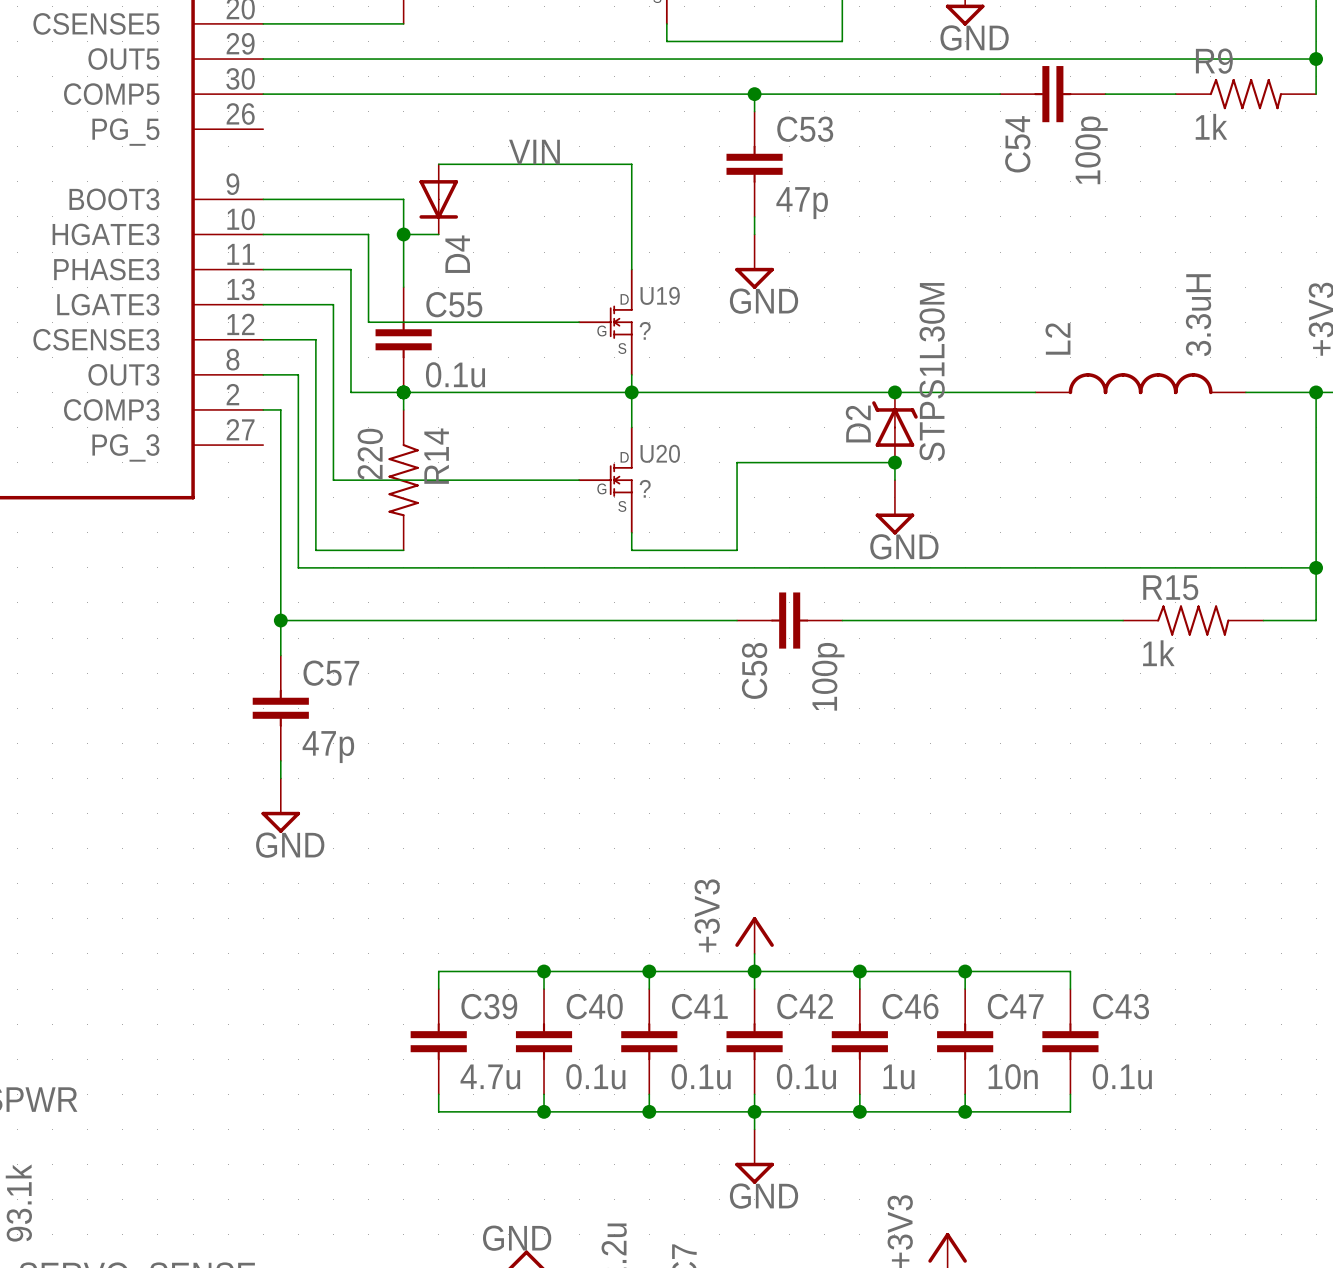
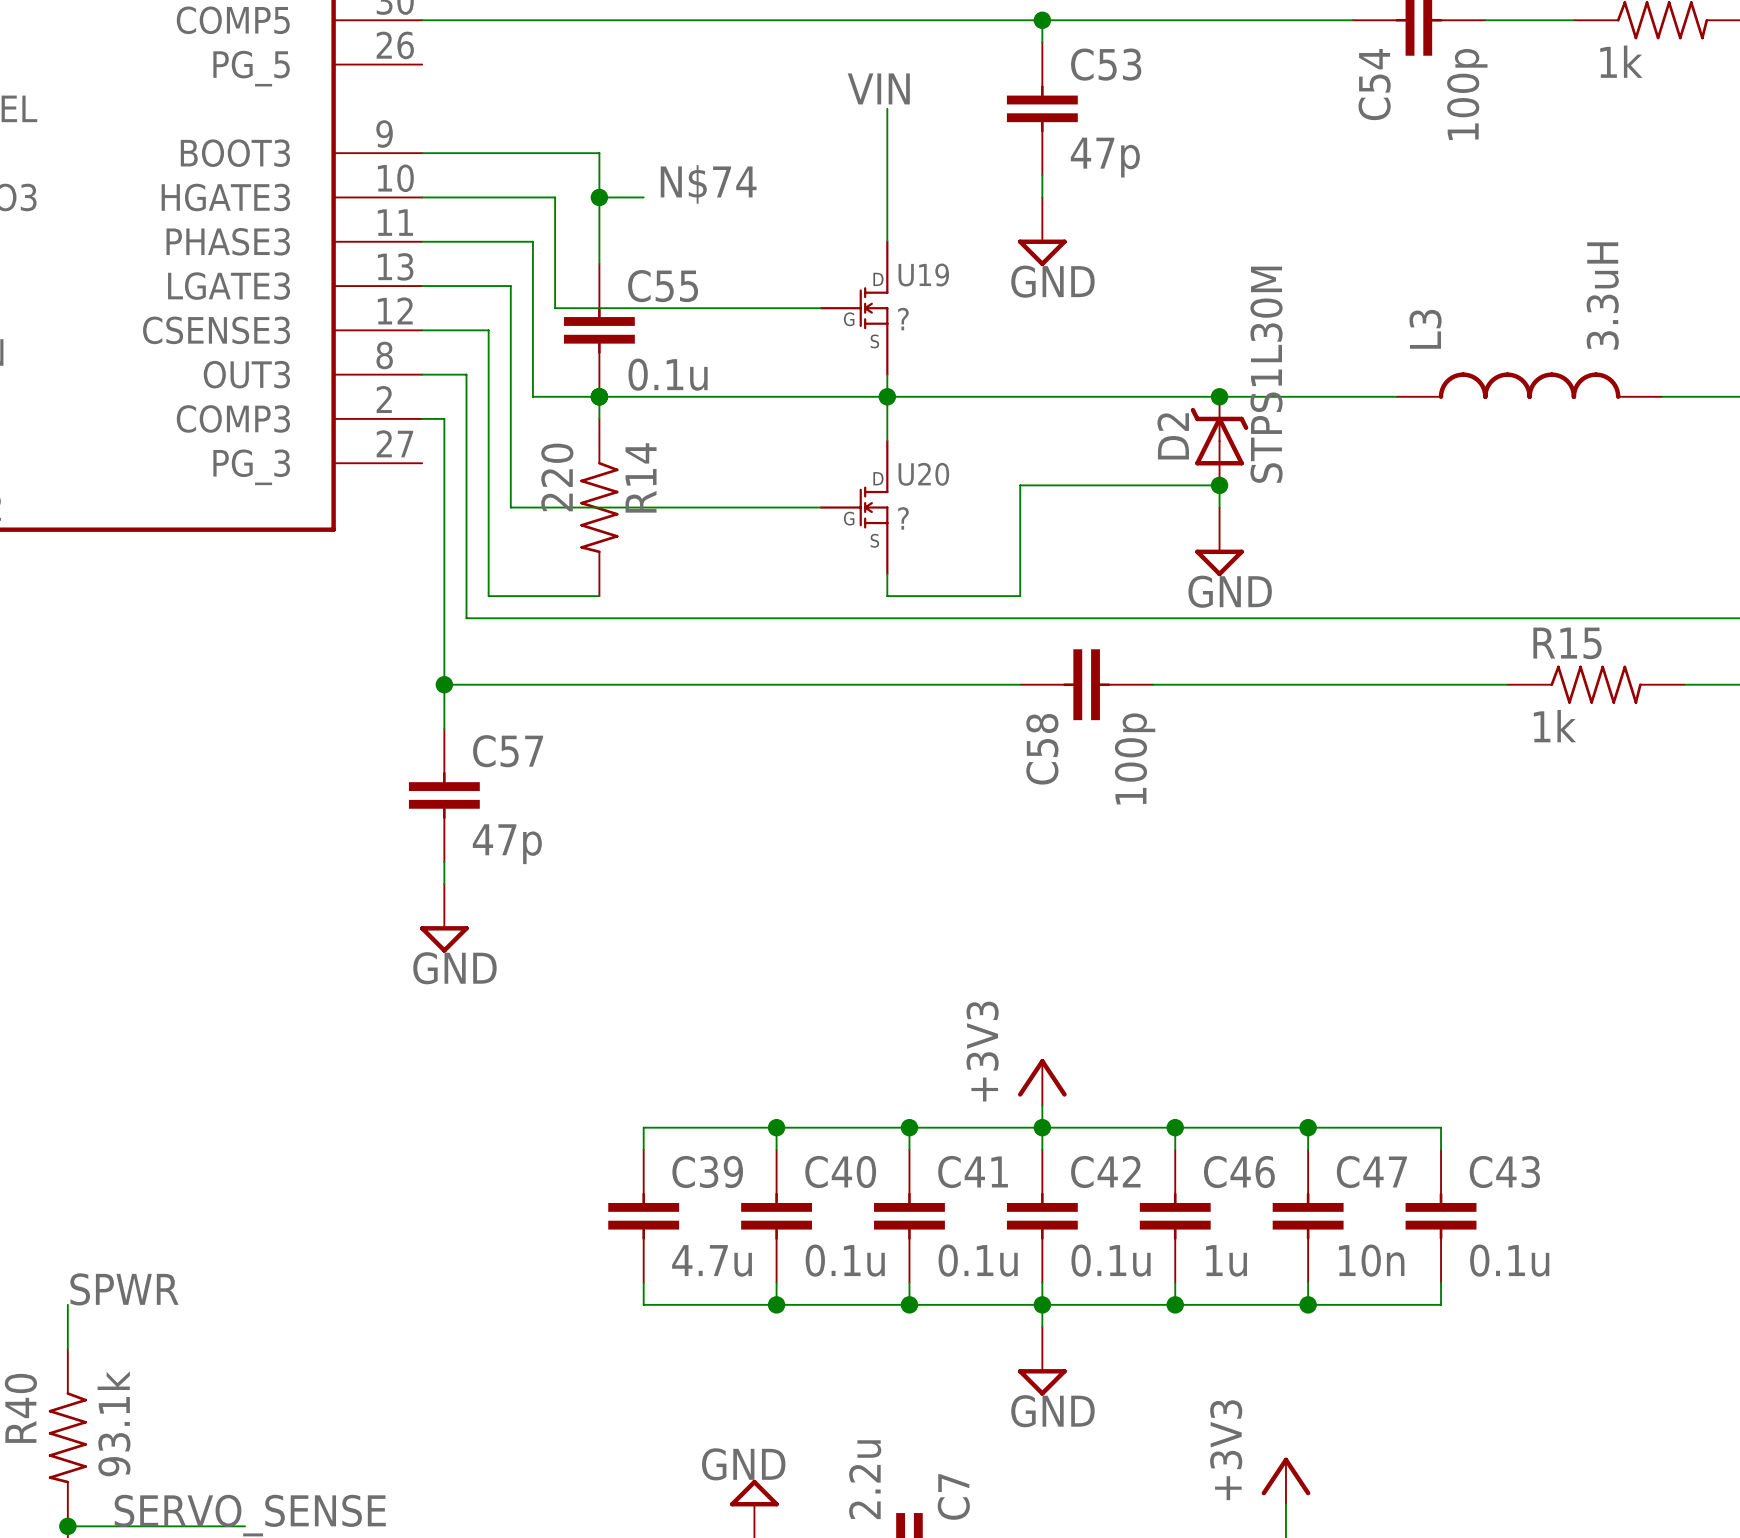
label position: VIN (534, 152) -> VIN (878, 88)
wire: (438, 164) (631, 164) -> none
D4: (438, 199) -> none
label: none -> N$74 (708, 184)
L2 name: L2 (1057, 338) -> L3 (1425, 329)

